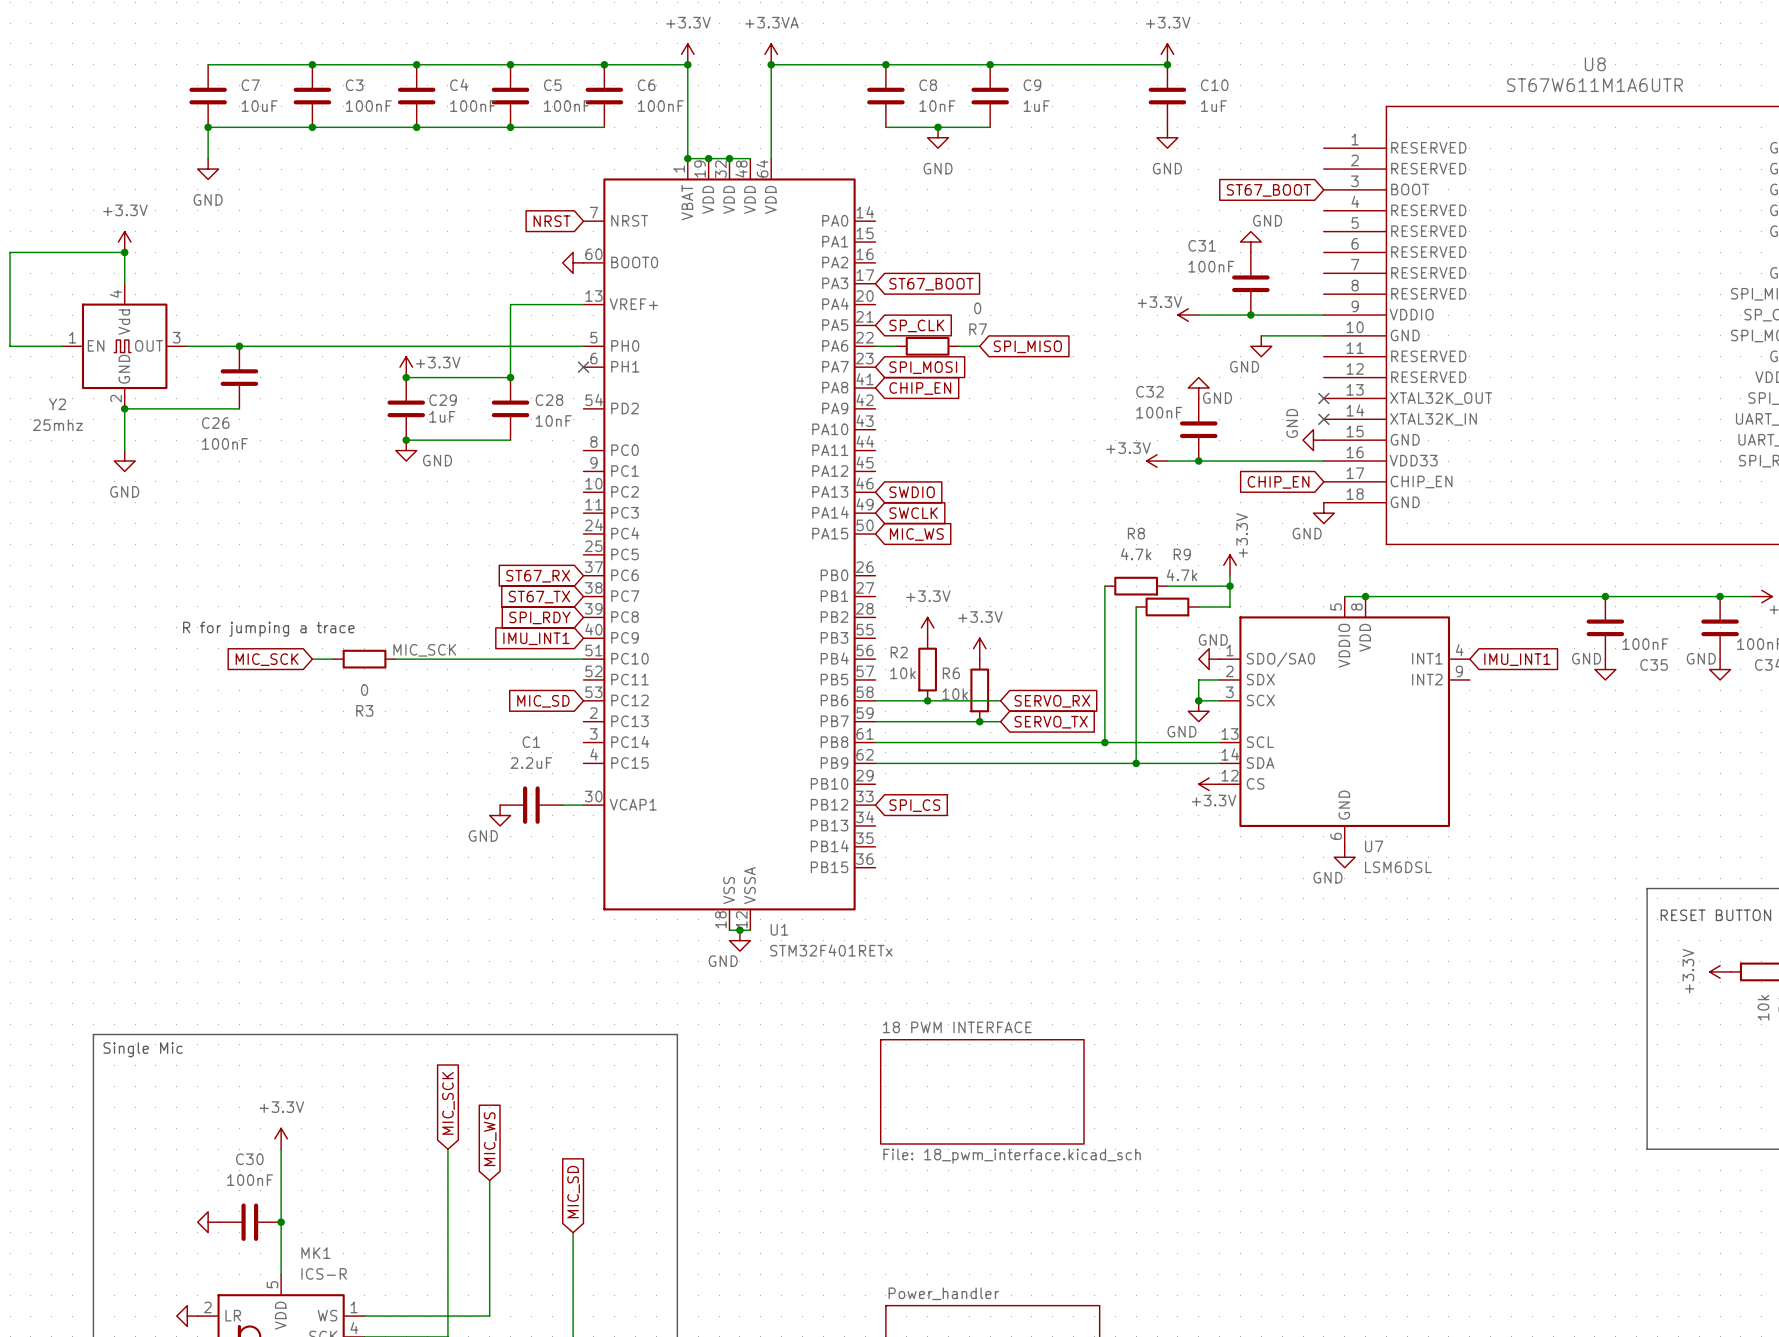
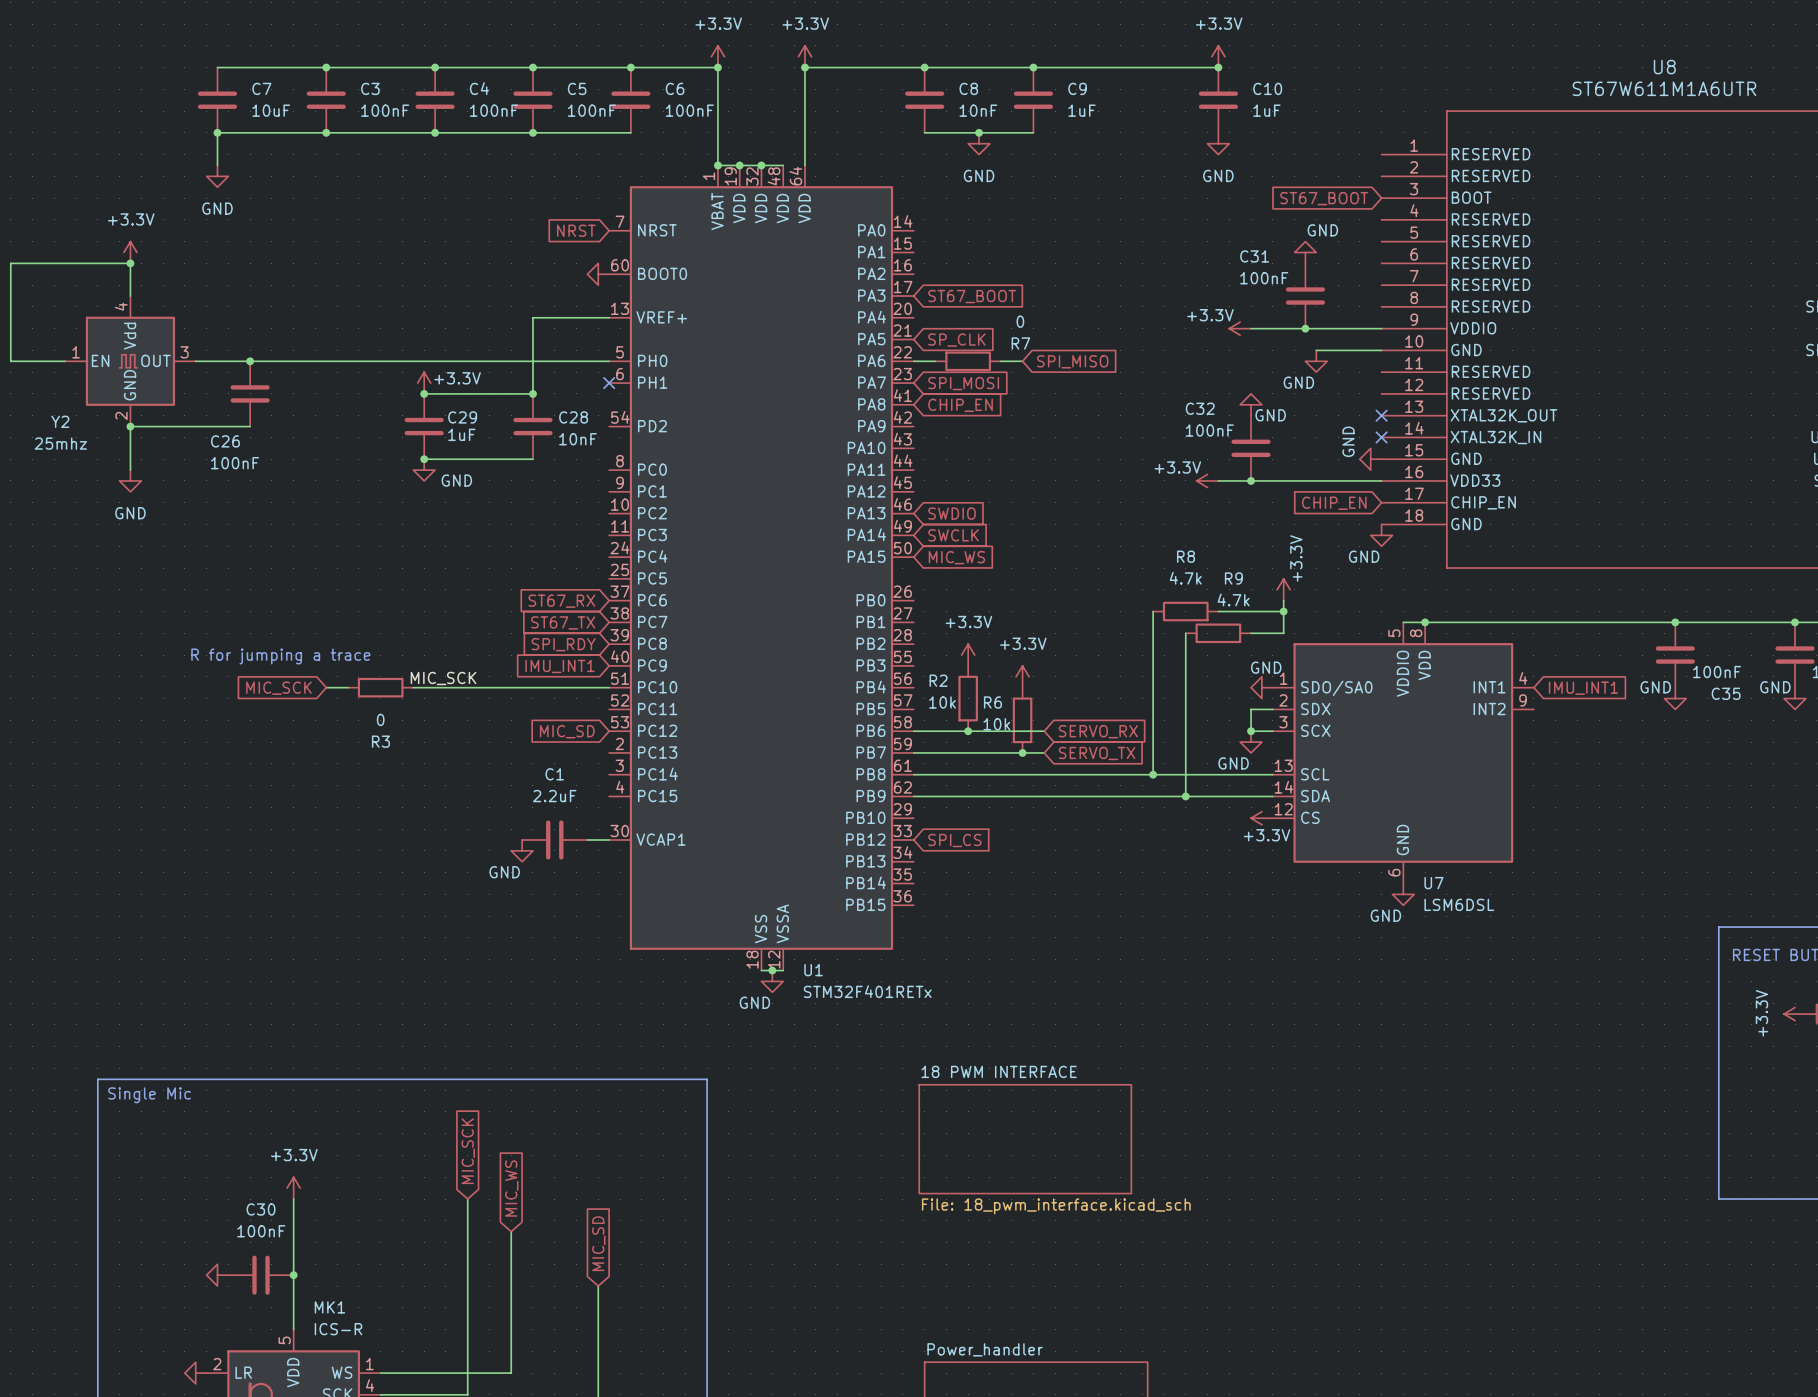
power symbol: +3.3VA (771, 54) -> +3.3V (804, 56)

